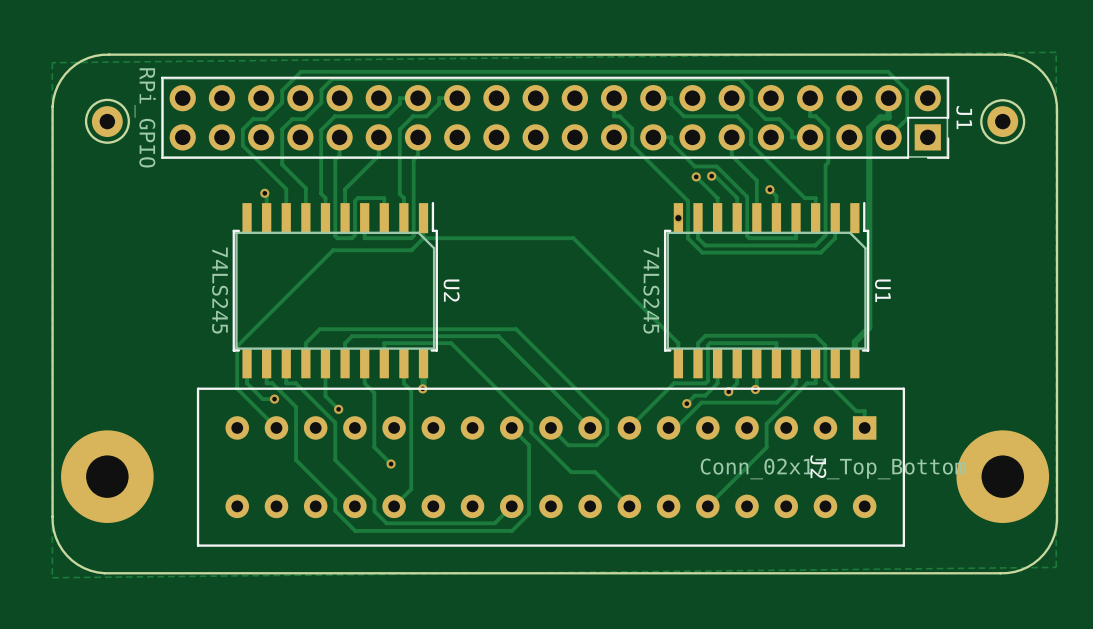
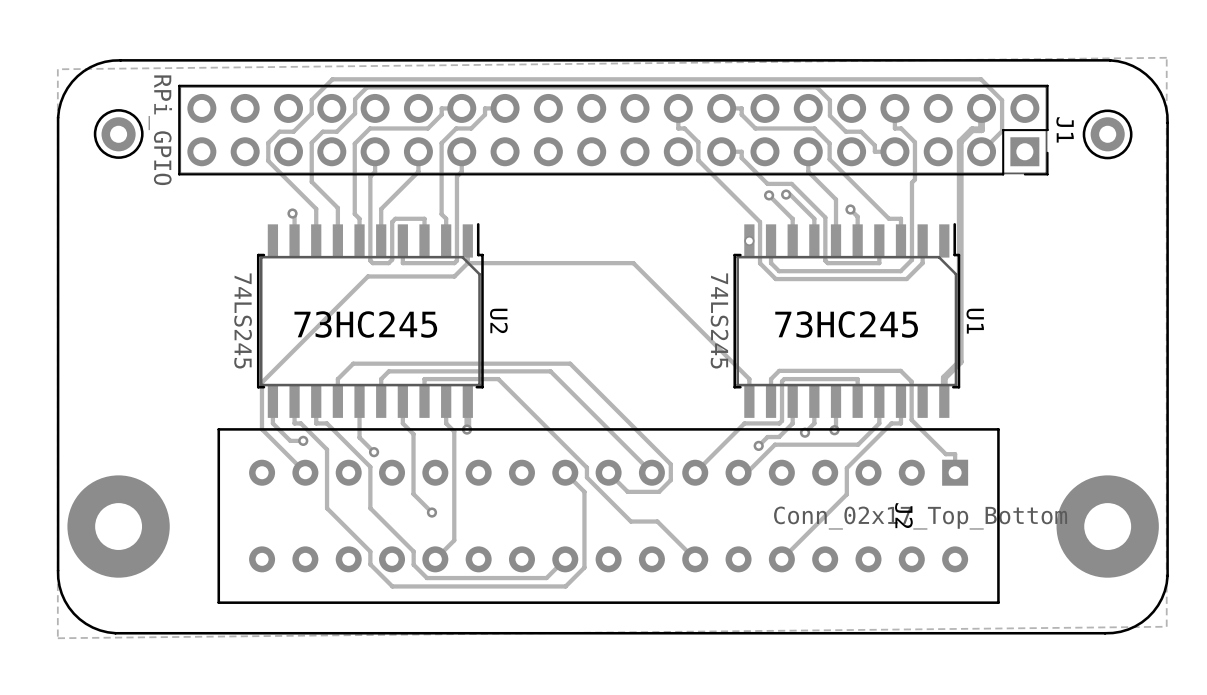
text: none -> 73HC245 (365, 324)
text: none -> 73HC245 (846, 324)

